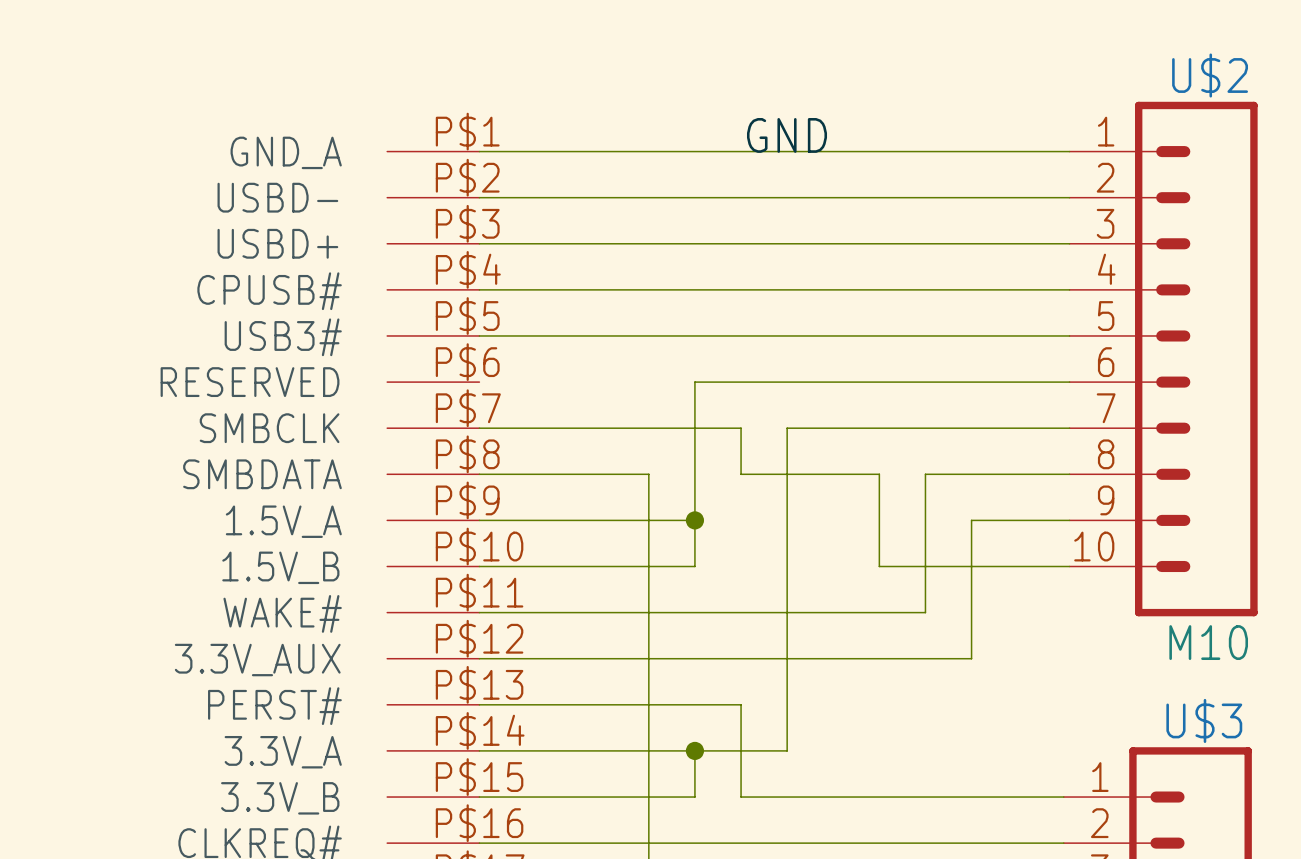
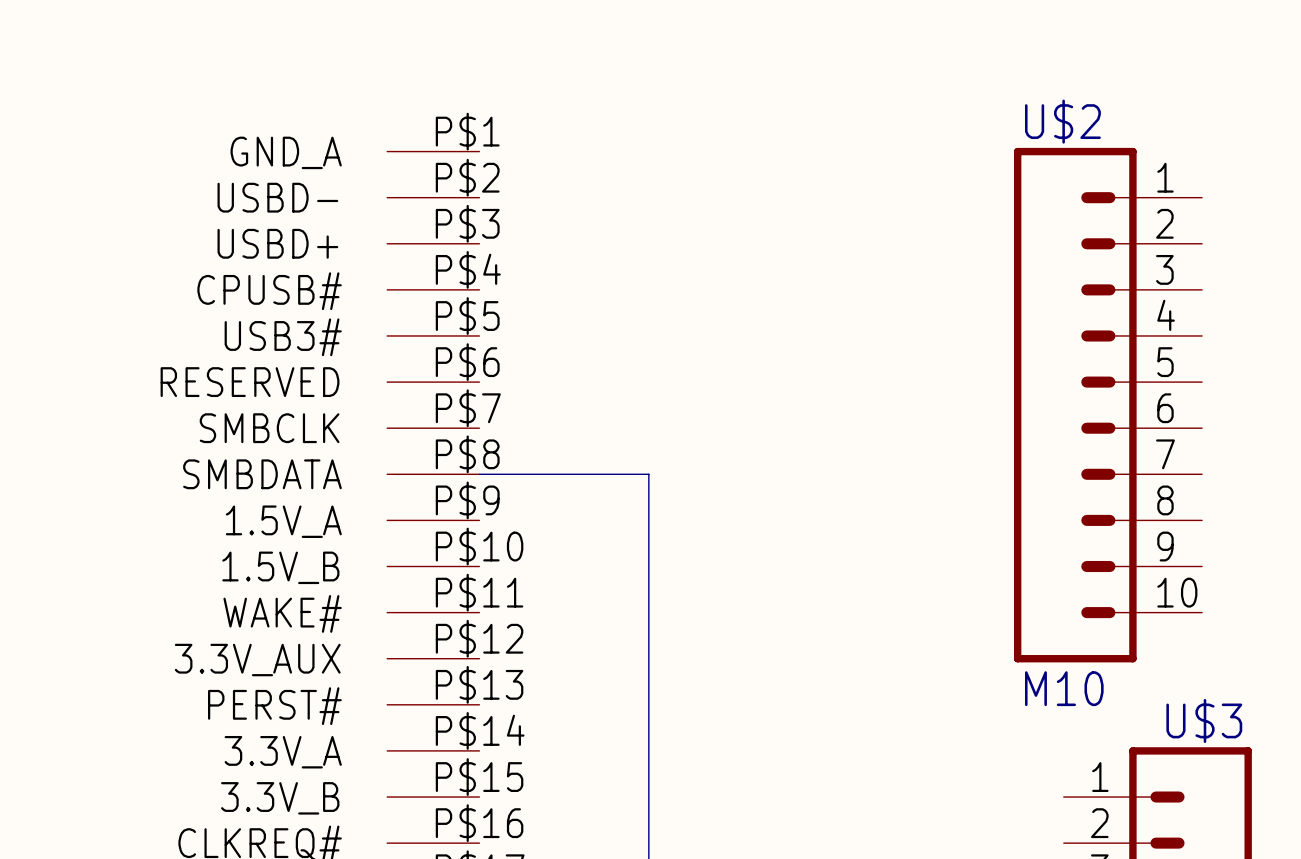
label: GND (787, 135) -> none
wire: (479, 151) (1069, 151) -> none
wire: (479, 197) (1069, 197) -> none
wire: (479, 243) (1069, 243) -> none
wire: (479, 289) (1069, 289) -> none
wire: (479, 335) (1069, 335) -> none
U$2 flip: as is (1196, 359) -> left-right (1075, 405)
wire: (1069, 382) (694, 382) (694, 566) (479, 566) -> none
wire: (479, 428) (741, 428) (741, 474) (879, 474) (879, 566) (1069, 566) -> none
wire: (1069, 428) (787, 428) (787, 750) (479, 750) -> none
wire: (1069, 474) (925, 474) (925, 612) (479, 612) -> none
wire: (479, 520) (694, 520) -> none
junction: (694, 520) -> none
wire: (1069, 520) (971, 520) (971, 658) (479, 658) -> none
wire: (479, 704) (741, 704) (741, 797) (1063, 797) -> none
wire: (694, 750) (694, 797) (479, 797) -> none
junction: (694, 750) -> none
wire: (479, 843) (1063, 843) -> none

